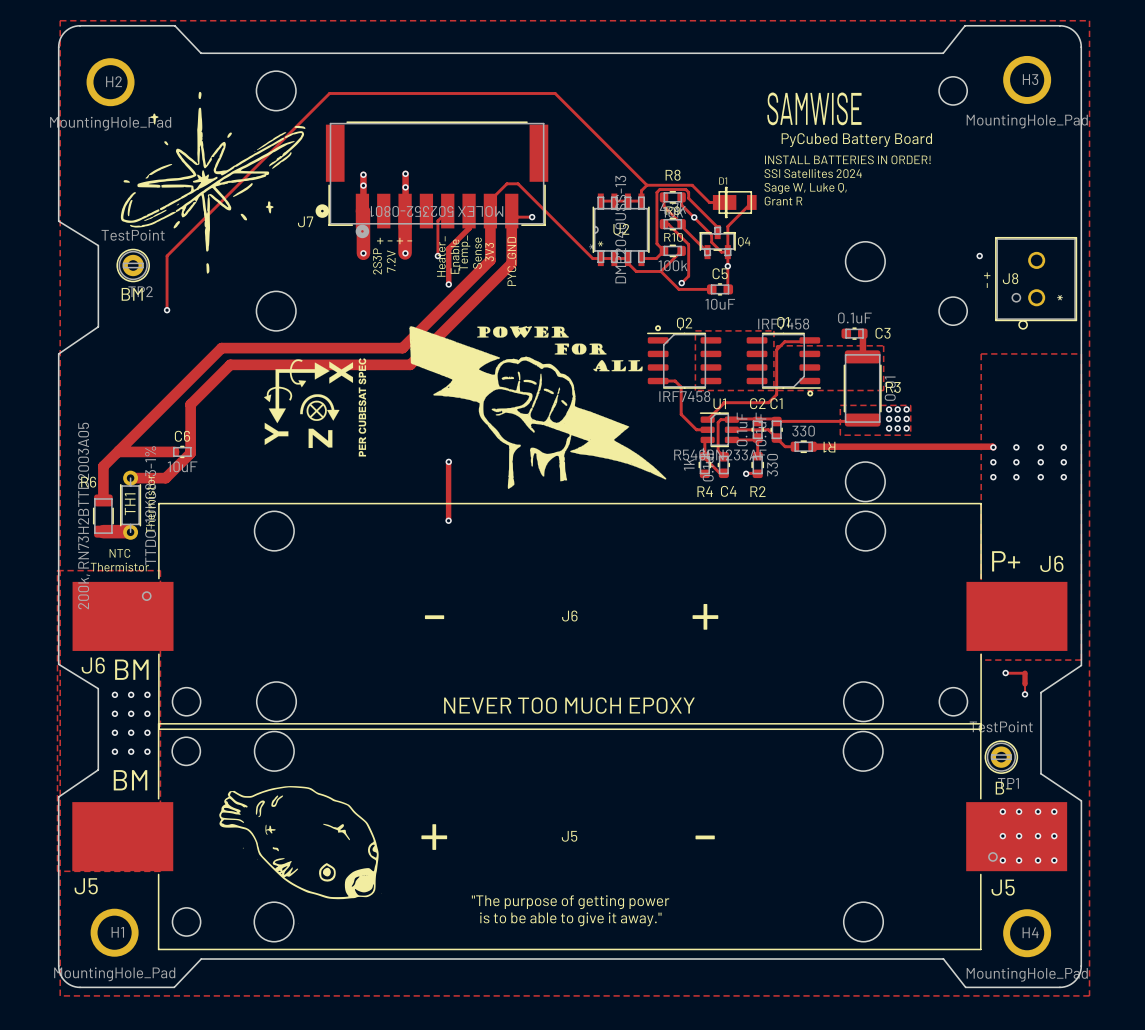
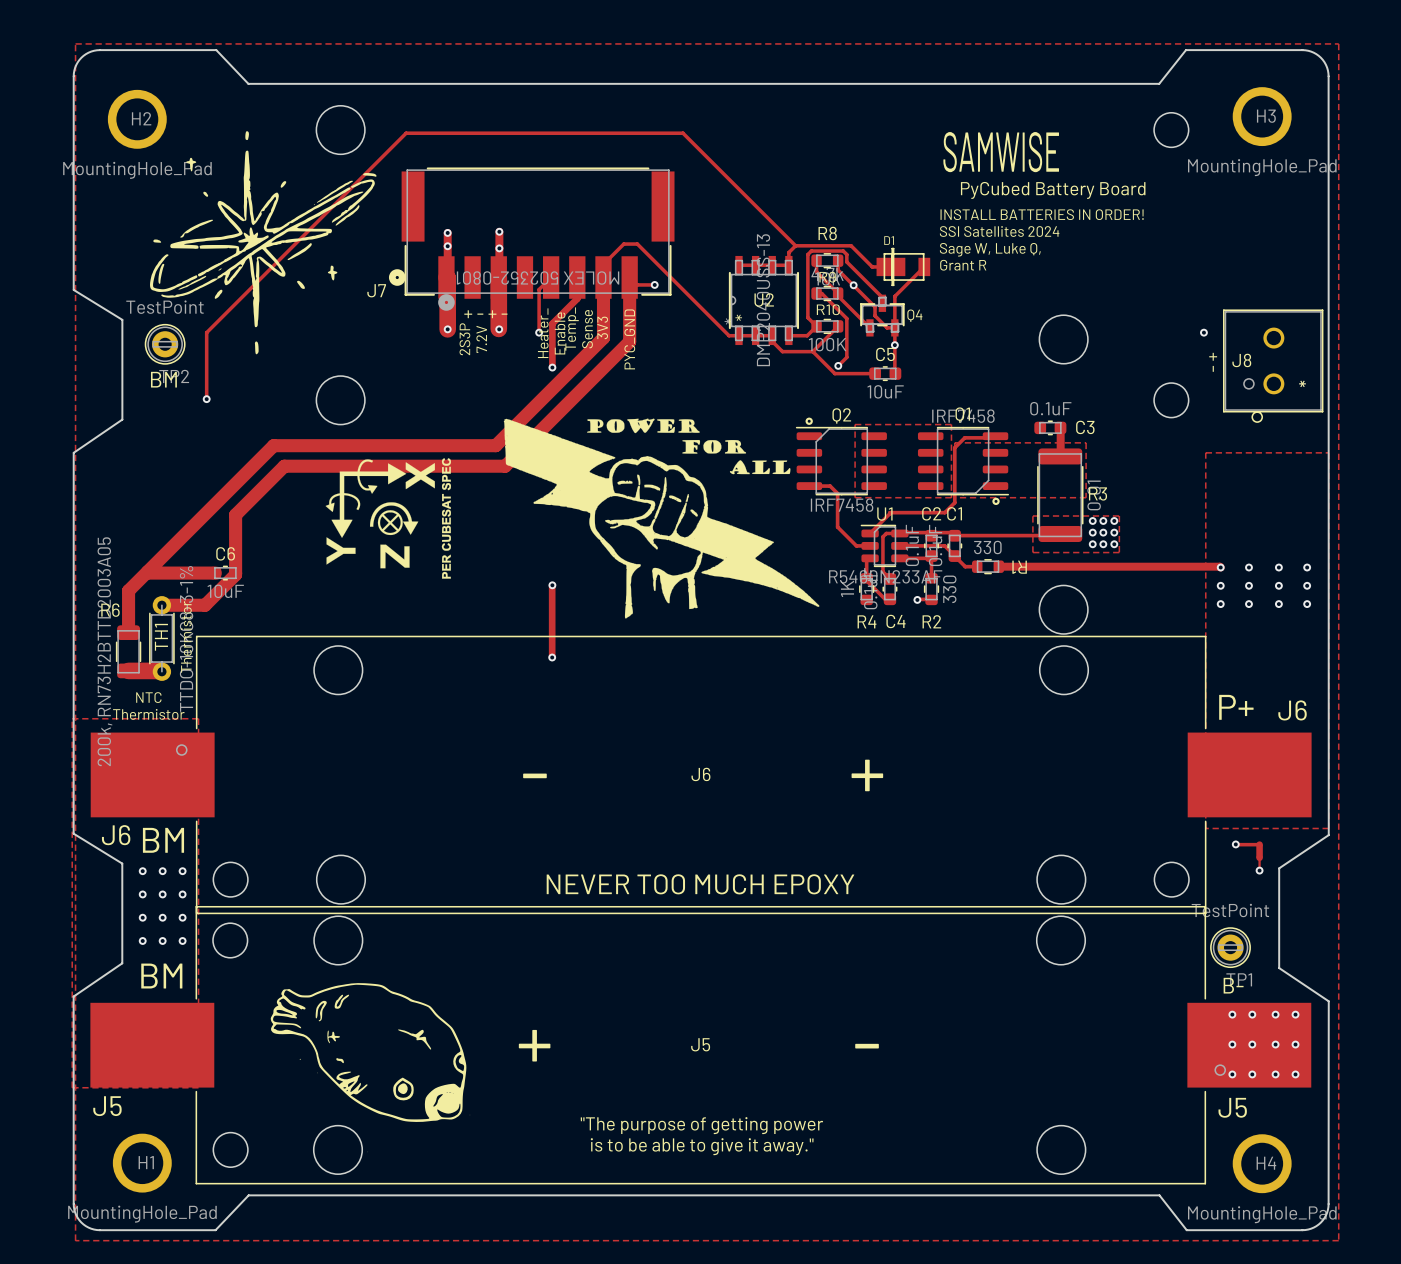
R10 value: 100k (673, 265) -> 100K (827, 344)
R4 value: 1k (689, 464) -> 1K (847, 588)

